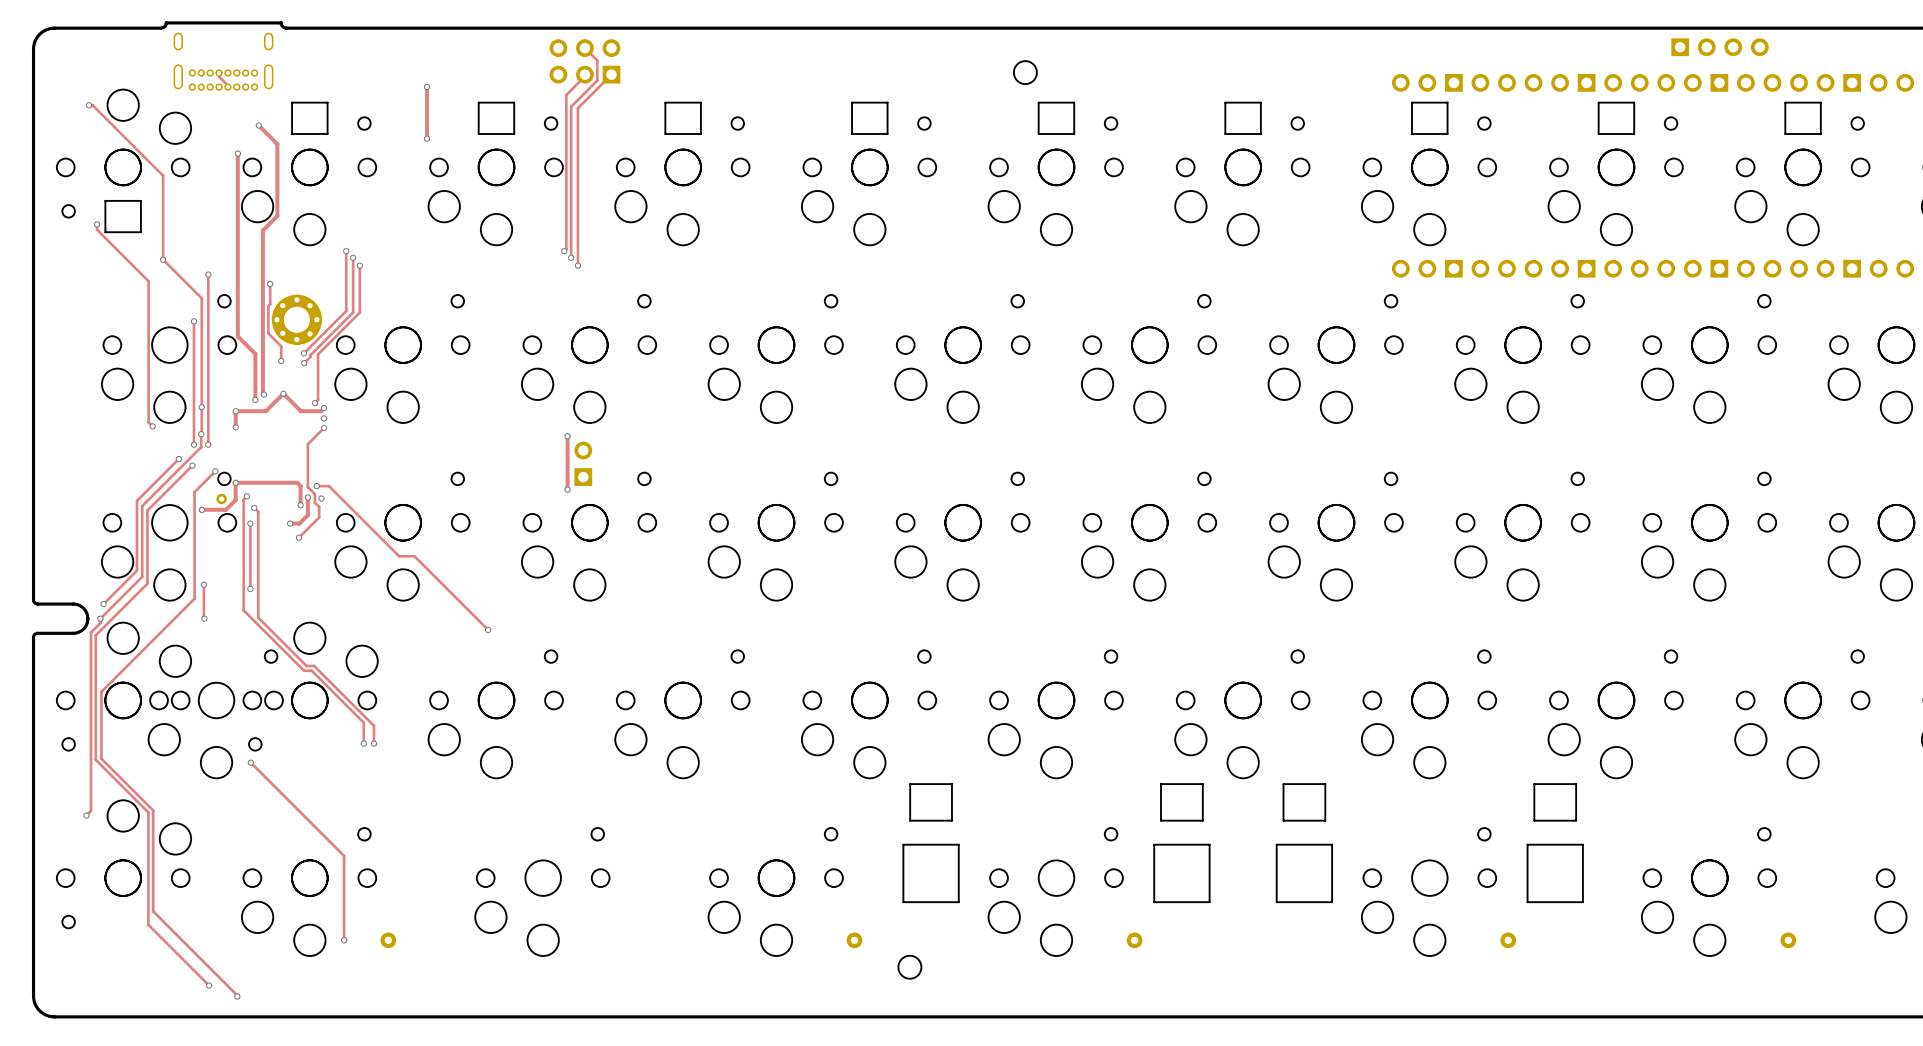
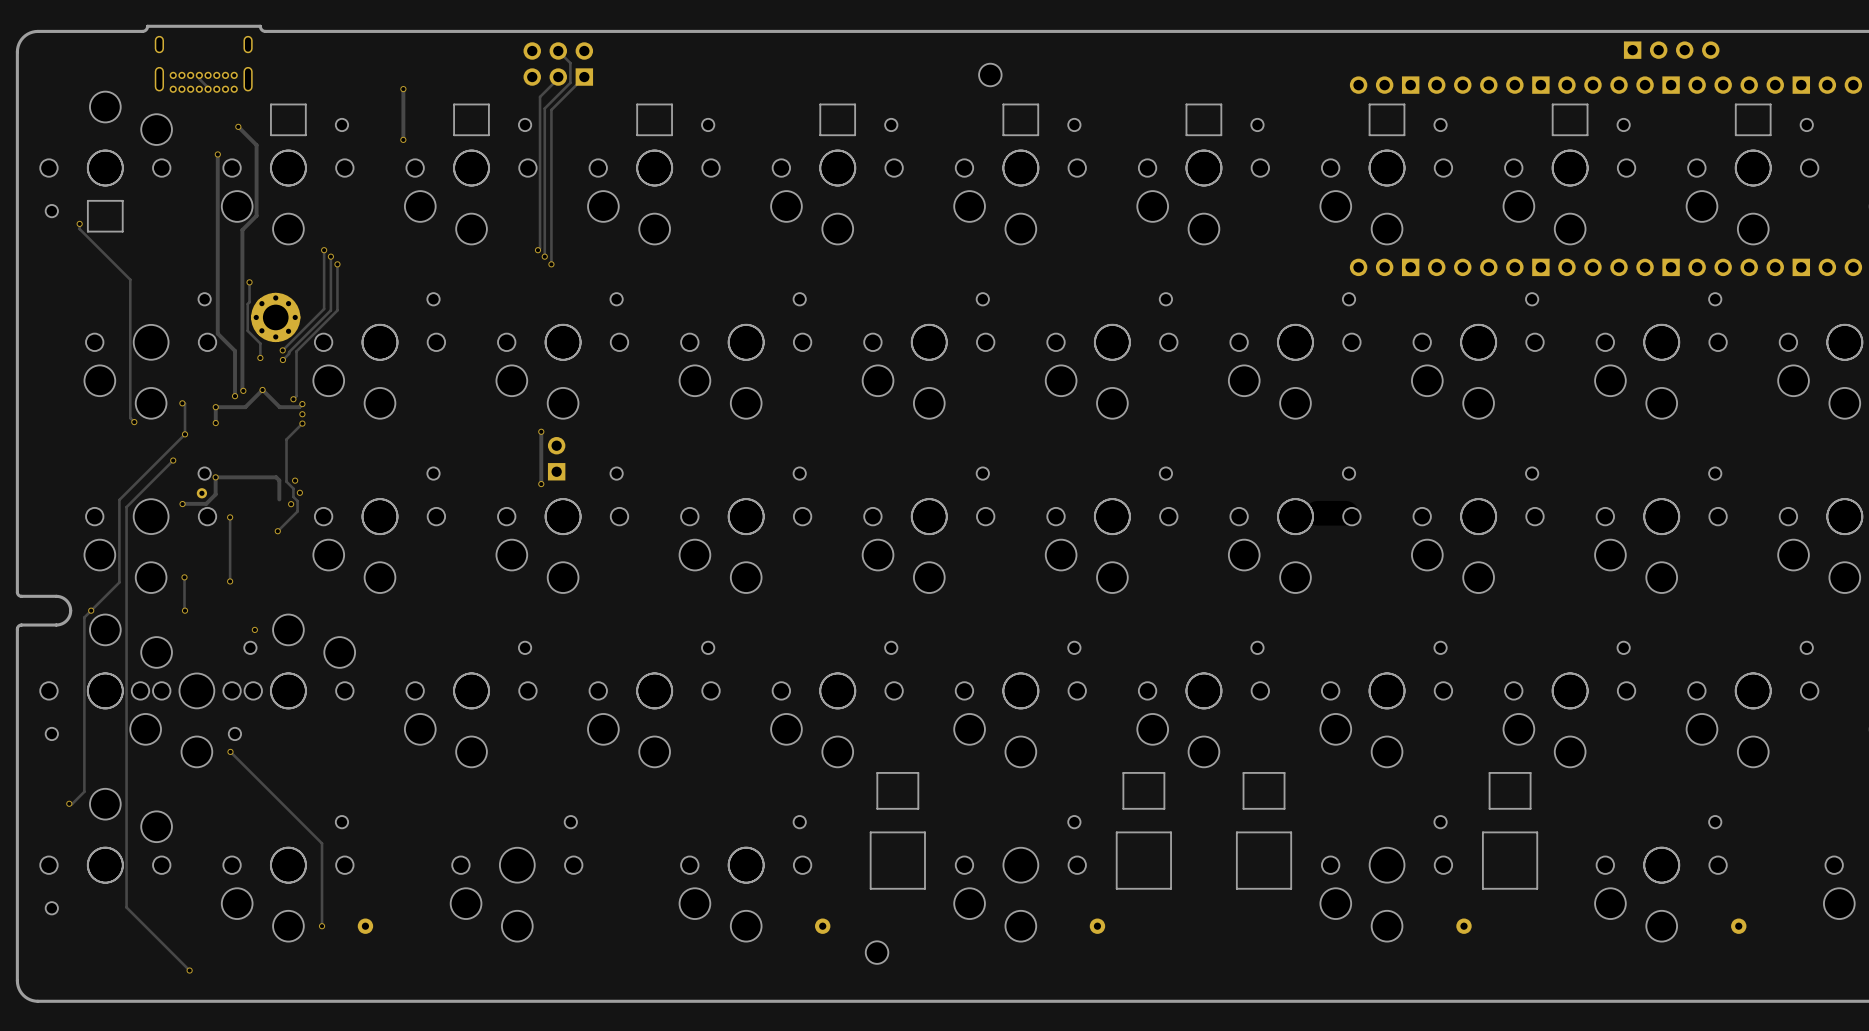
track: (88, 105) (92, 105) (163, 175) (163, 259) (201, 298) (201, 433) (201, 447) (142, 506) (142, 576) (100, 618) (100, 623) (91, 632) (91, 810) (86, 815) -> none
via: (88, 105) -> none
via: (163, 259) -> none
track: (208, 274) (208, 444) -> none
via: (208, 274) -> none
track: (193, 321) (193, 444) -> none
via: (193, 321) -> none
track: none -> (184, 403) (185, 434) (119, 499) (119, 582) (84, 617) (84, 791) (71, 804)
via: (201, 434) -> none
via: none -> (185, 434)
via: (193, 444) -> none
via: (208, 444) -> none
track: (178, 459) (137, 500) (137, 570) (103, 604) -> none
via: (178, 459) -> none
track: (215, 471) (194, 492) (194, 598) (101, 691) (101, 758) (153, 810) (153, 911) (237, 996) -> none
via: (215, 471) -> none
track: (316, 486) (329, 486) (399, 556) (414, 556) (488, 629) -> none
track: (246, 496) (243, 499) (243, 610) (304, 670) (311, 670) (363, 722) (363, 743) -> none
via: (246, 496) -> none
track: (307, 497) (307, 515) (299, 523) (290, 523) -> none
via: (307, 497) -> none
via: (300, 505) -> none
track: (254, 507) (258, 511) (258, 617) (306, 665) (314, 665) (373, 725) (373, 743) -> none
via: (254, 507) -> none
track: (147, 510) (147, 583) (95, 635) (95, 759) (148, 812) (148, 924) -> (129, 504) (126, 507) (126, 907) (130, 911)
via: none -> (291, 504)
via: (290, 523) -> none
via: (103, 604) -> none
via: (100, 618) -> none
via: none -> (91, 610)
via: (488, 629) -> none
via: none -> (254, 629)
via: (363, 743) -> none
via: (373, 743) -> none
via: (237, 996) -> none

